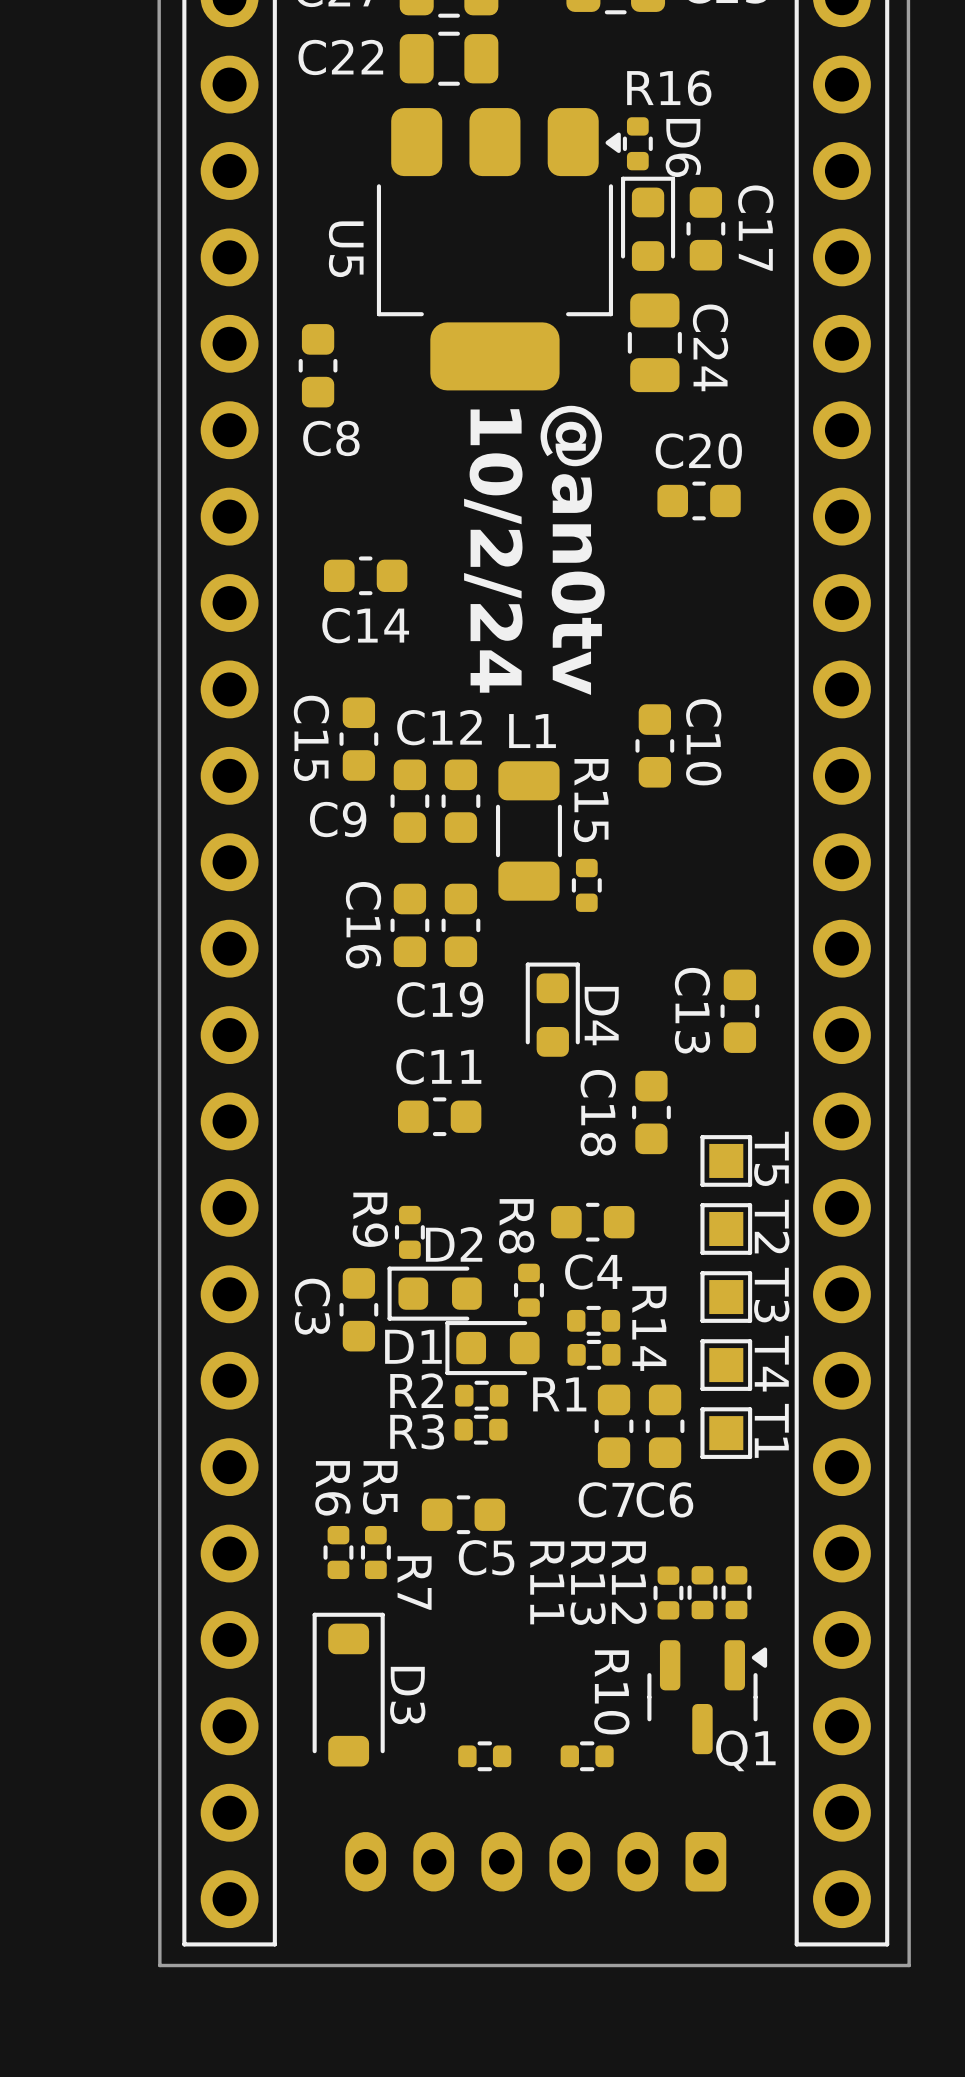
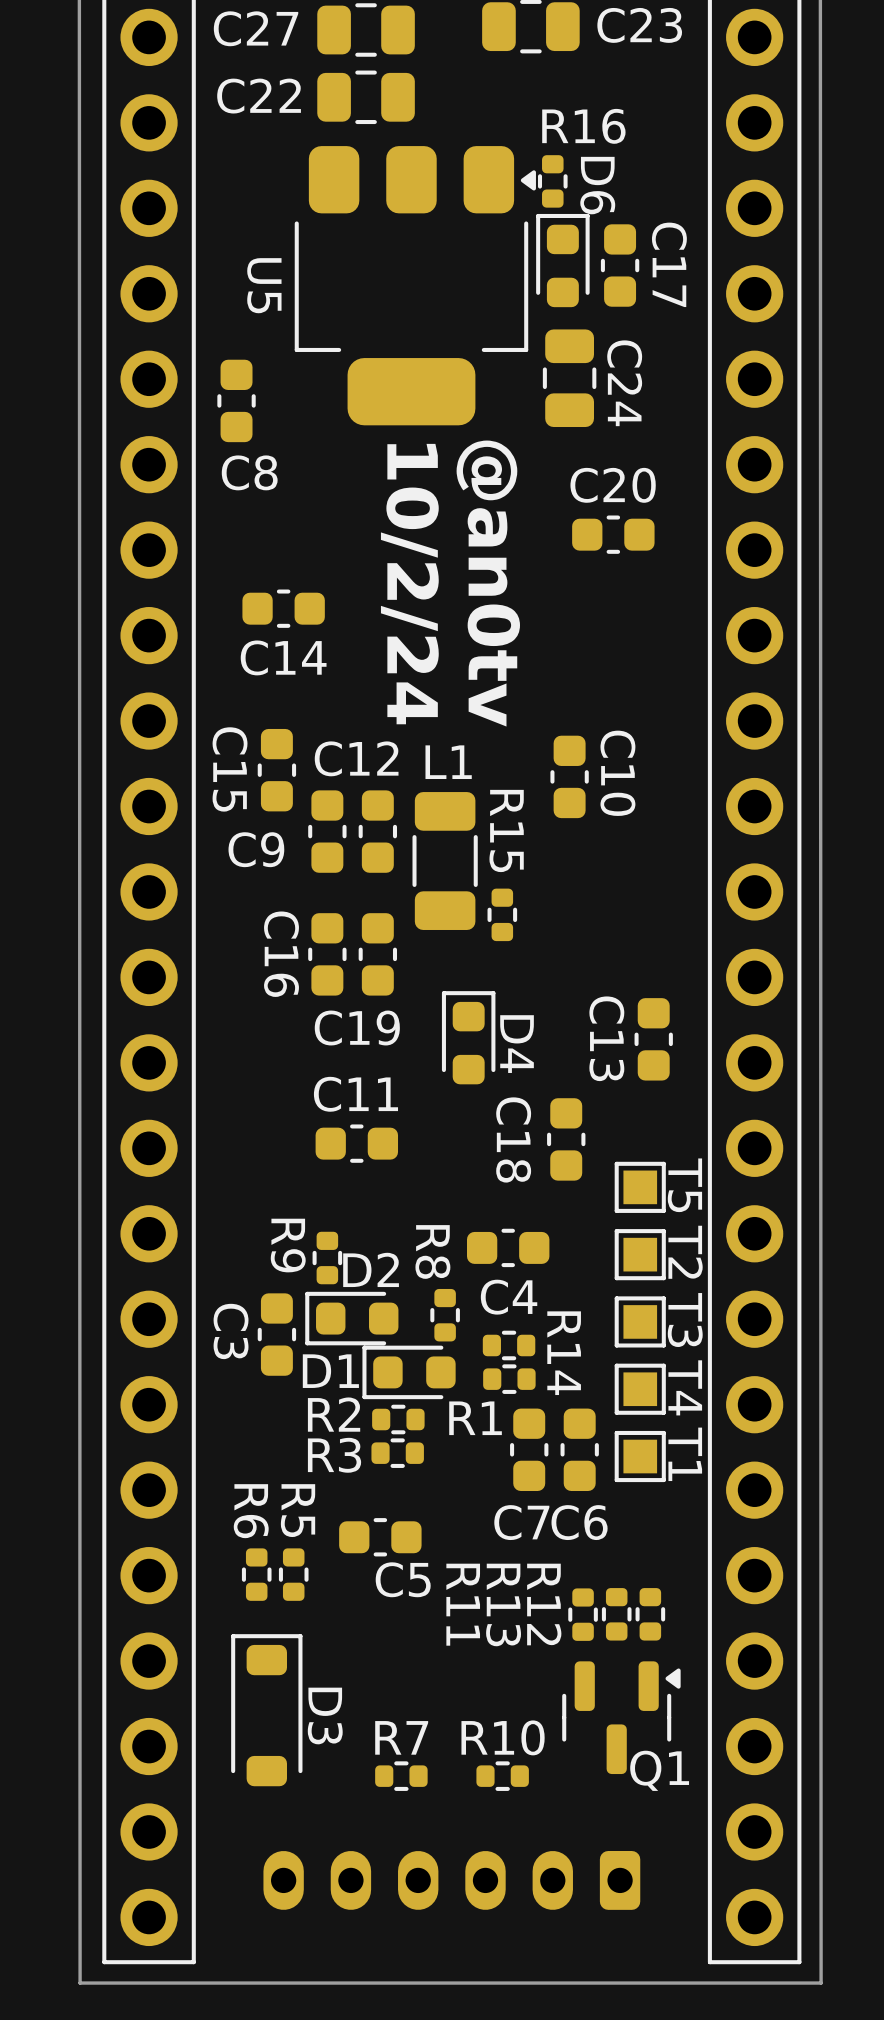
R7 name rotation: 0° (414, 1583) -> 90° counterclockwise (401, 1737)
R7 name position: R7 (414, 1583) -> R7 (401, 1737)
R10 name rotation: 0° (611, 1692) -> 90° counterclockwise (503, 1737)

